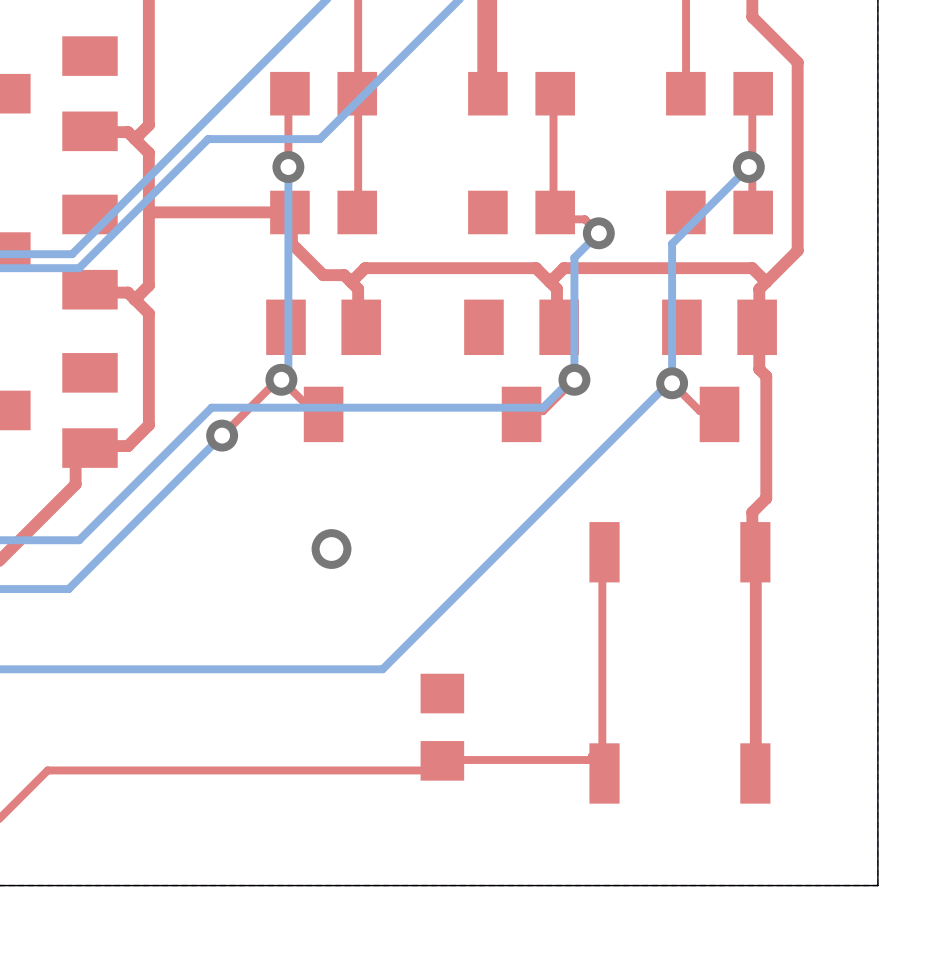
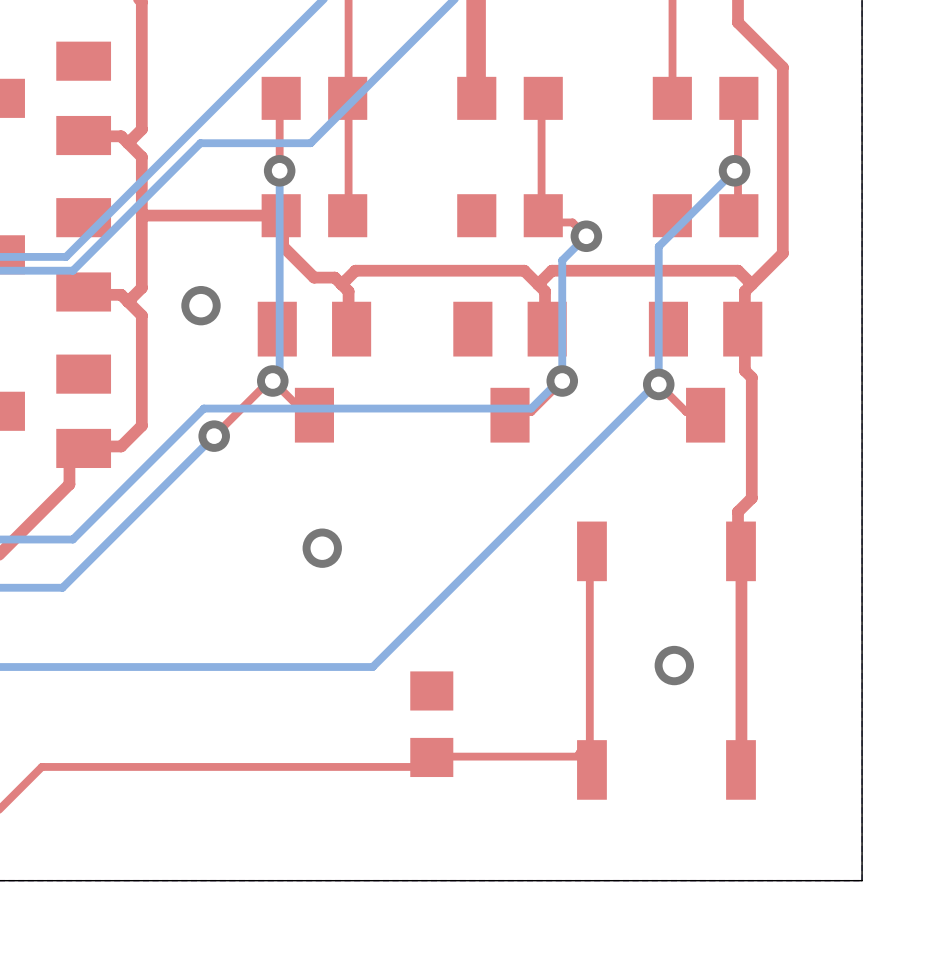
via: none -> (201, 305)
via: none -> (674, 665)

